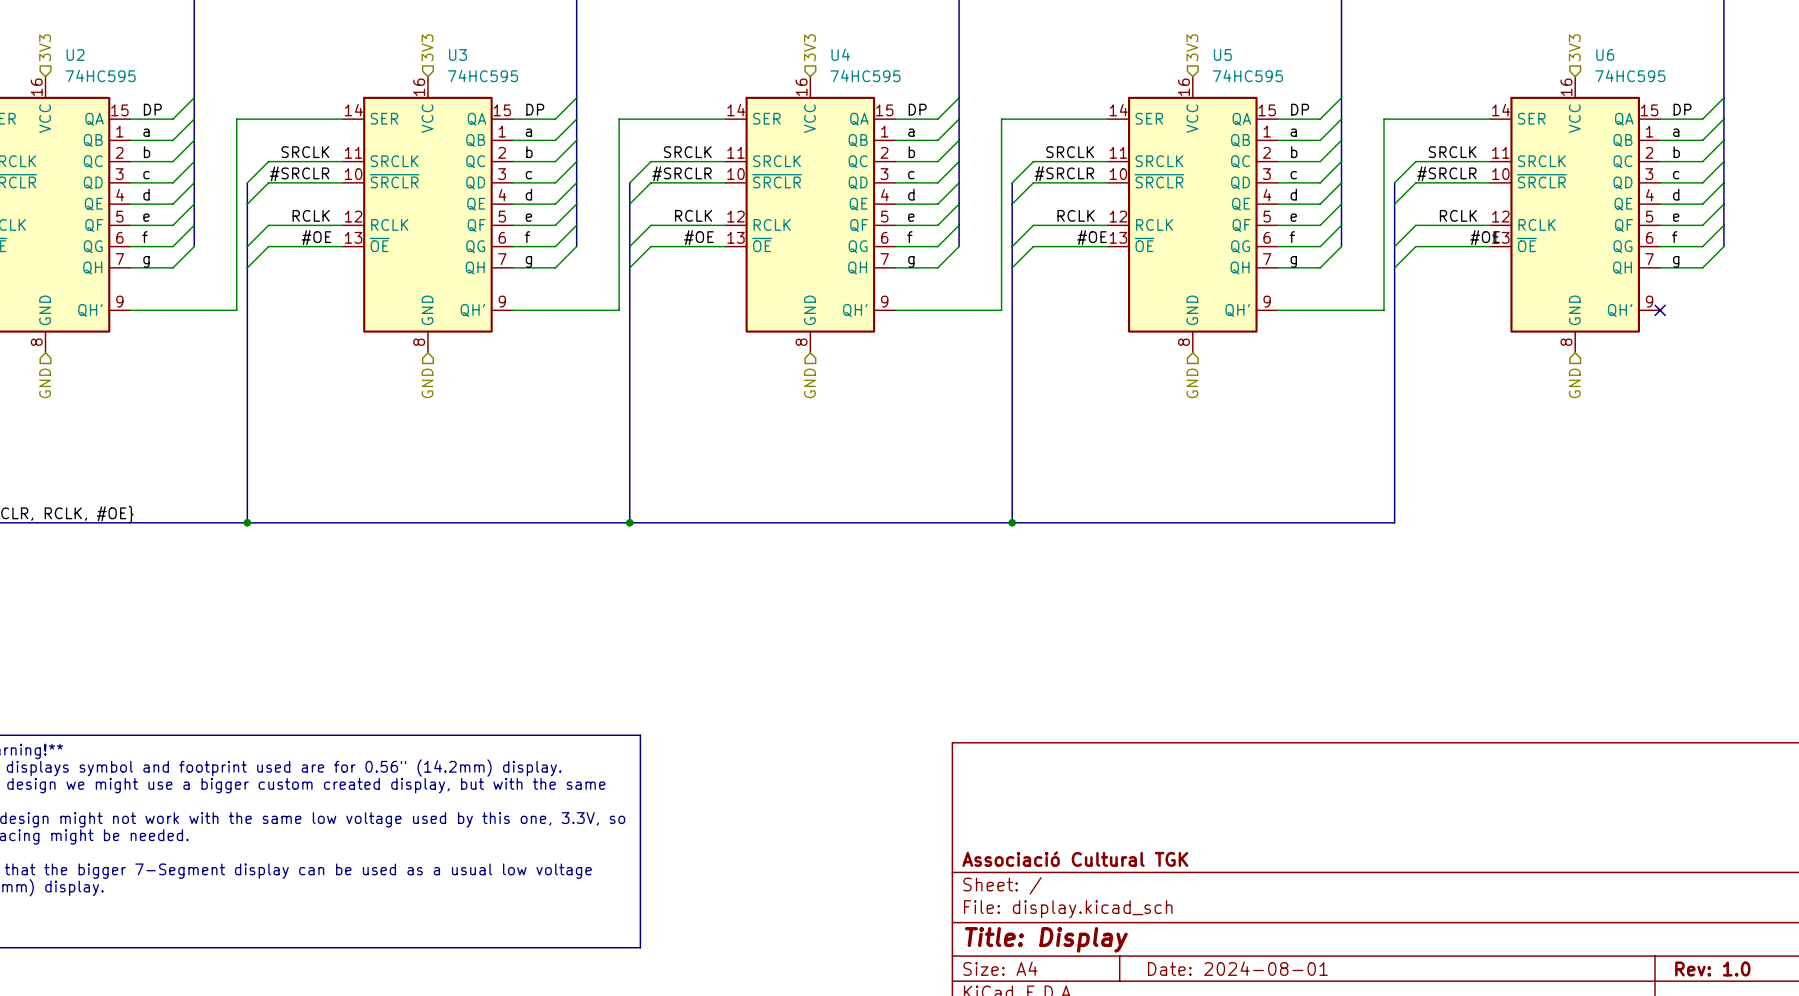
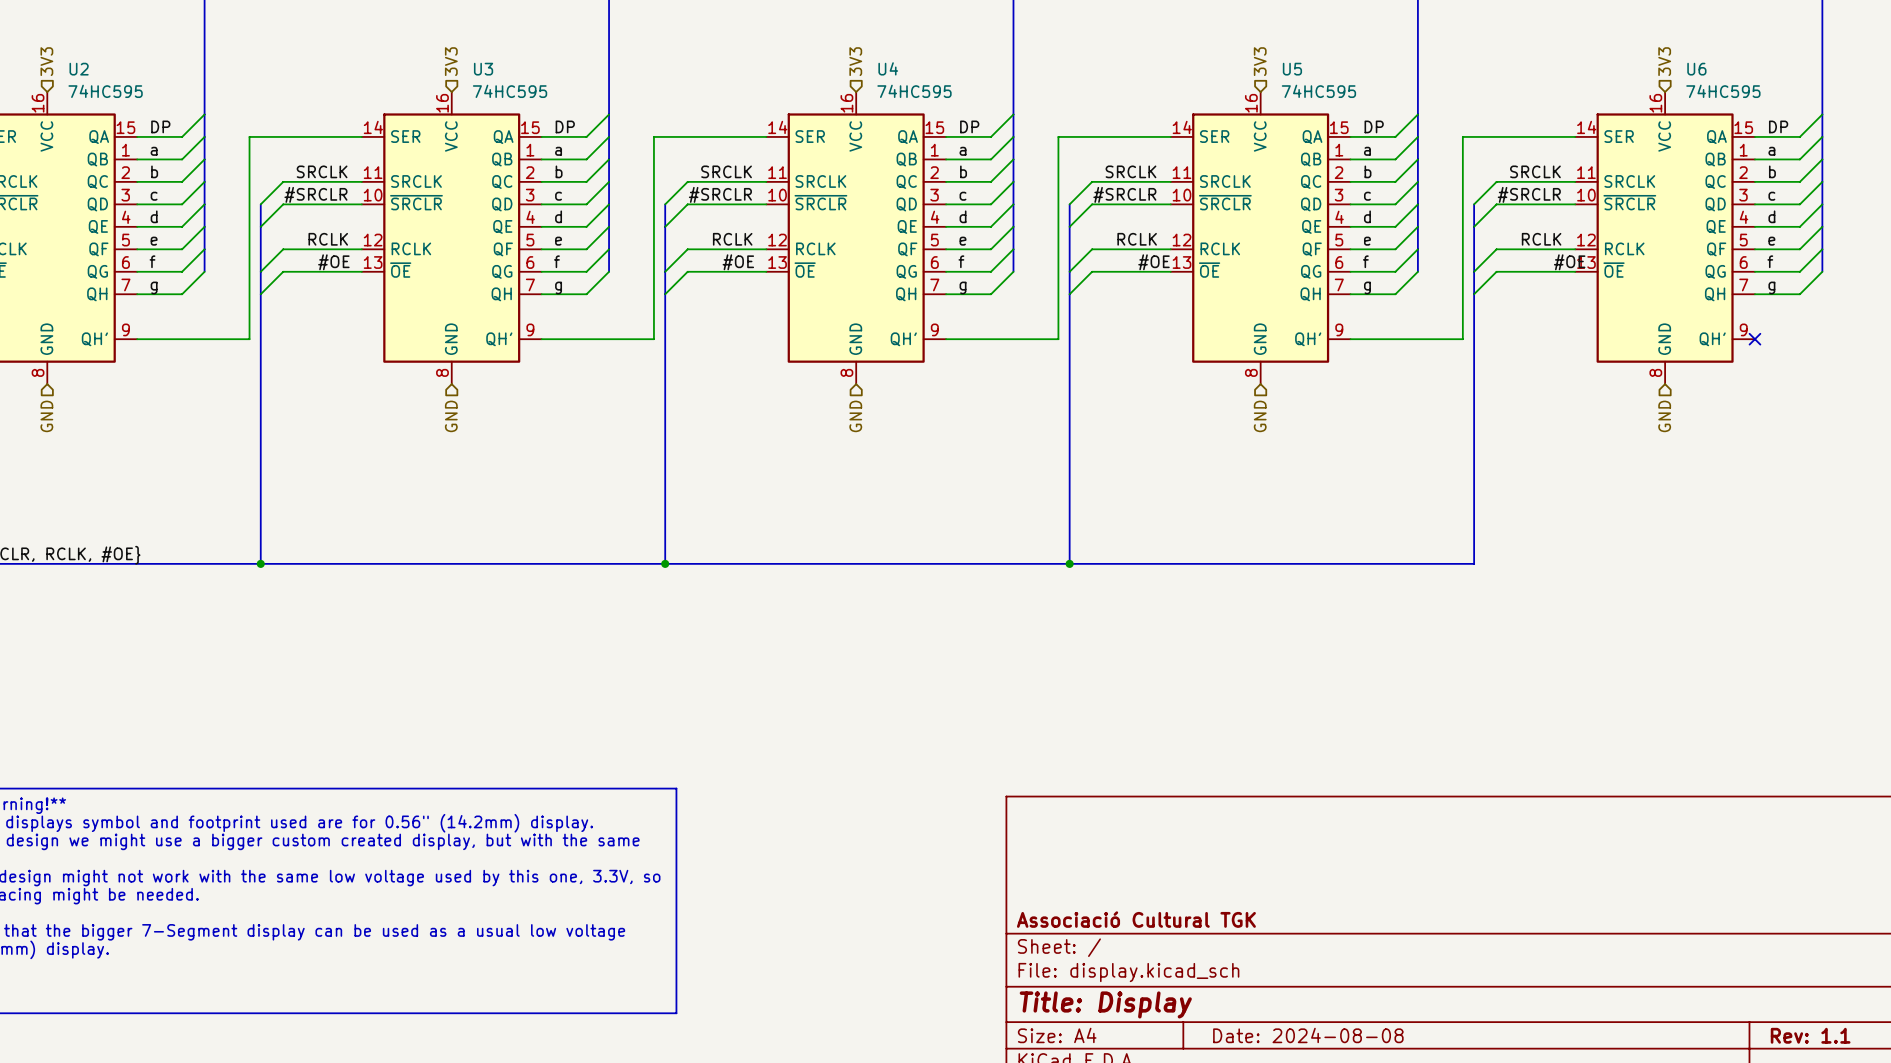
title block: Date: 2024-08-01 (1237, 968) -> Date: 2024-08-08 (1308, 1035)
title block: Rev: 1.0 (1712, 968) -> Rev: 1.1 (1810, 1035)

